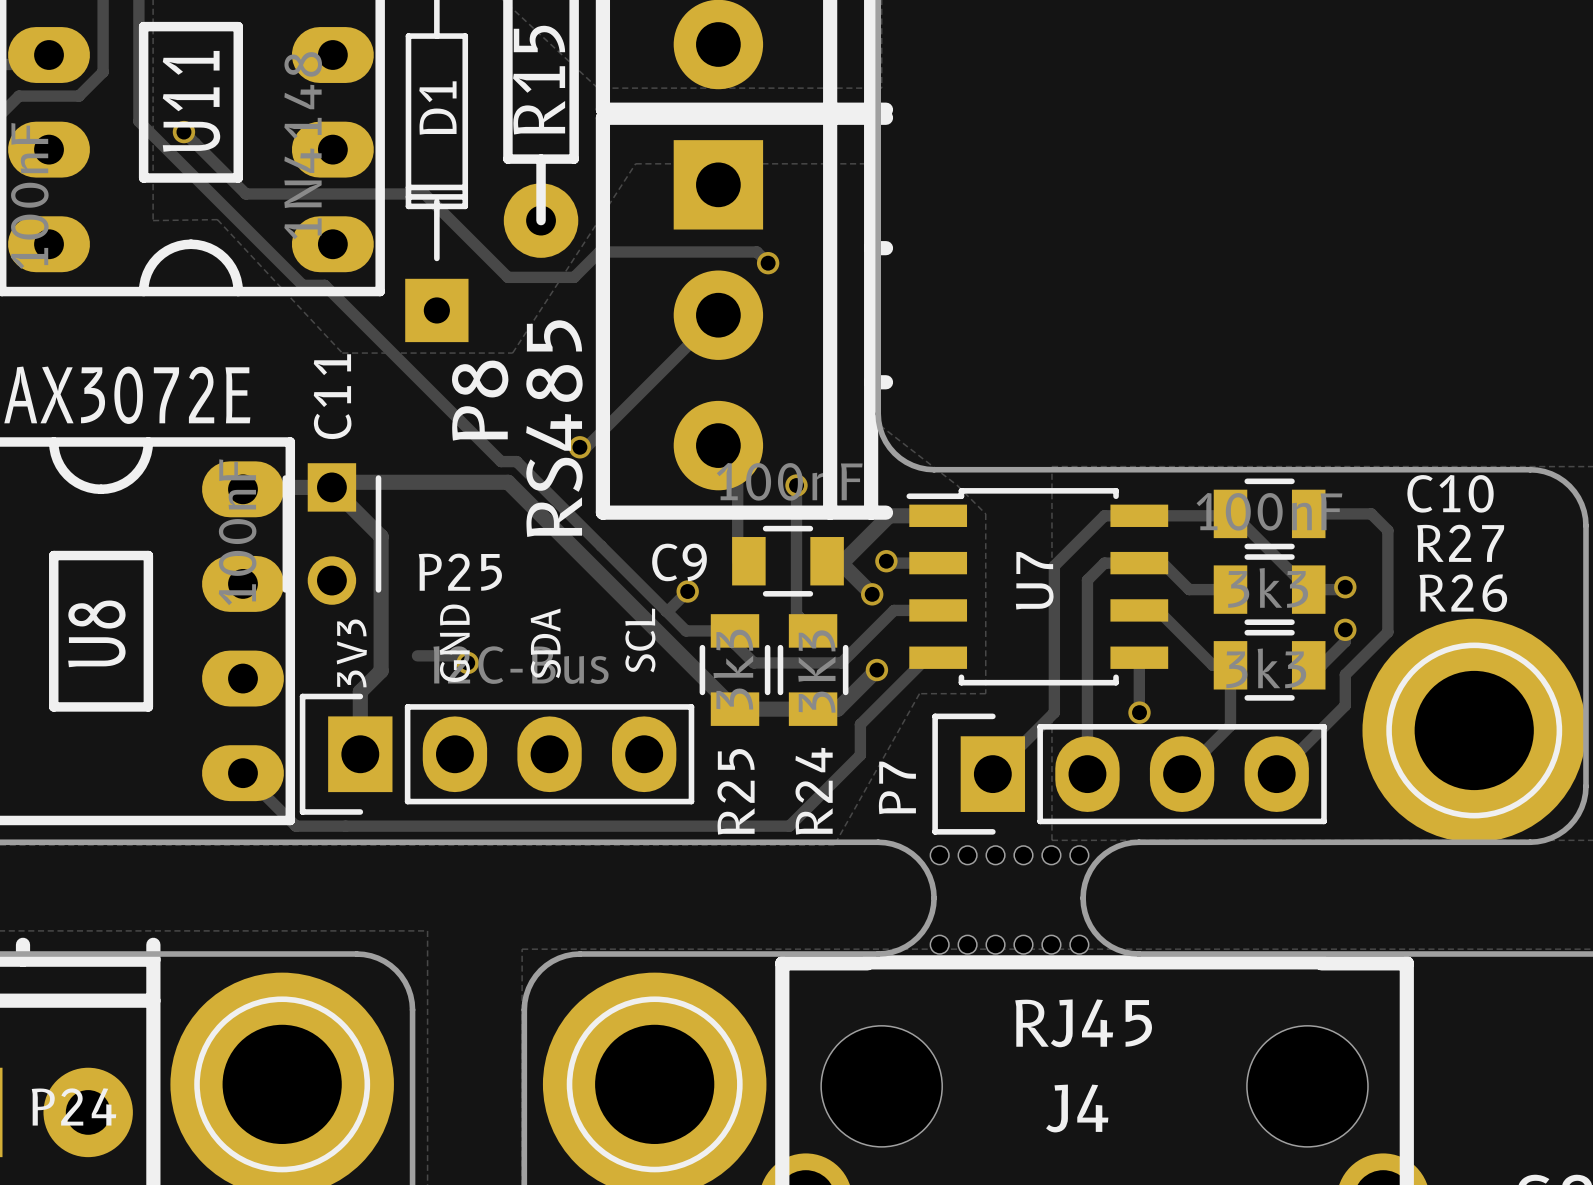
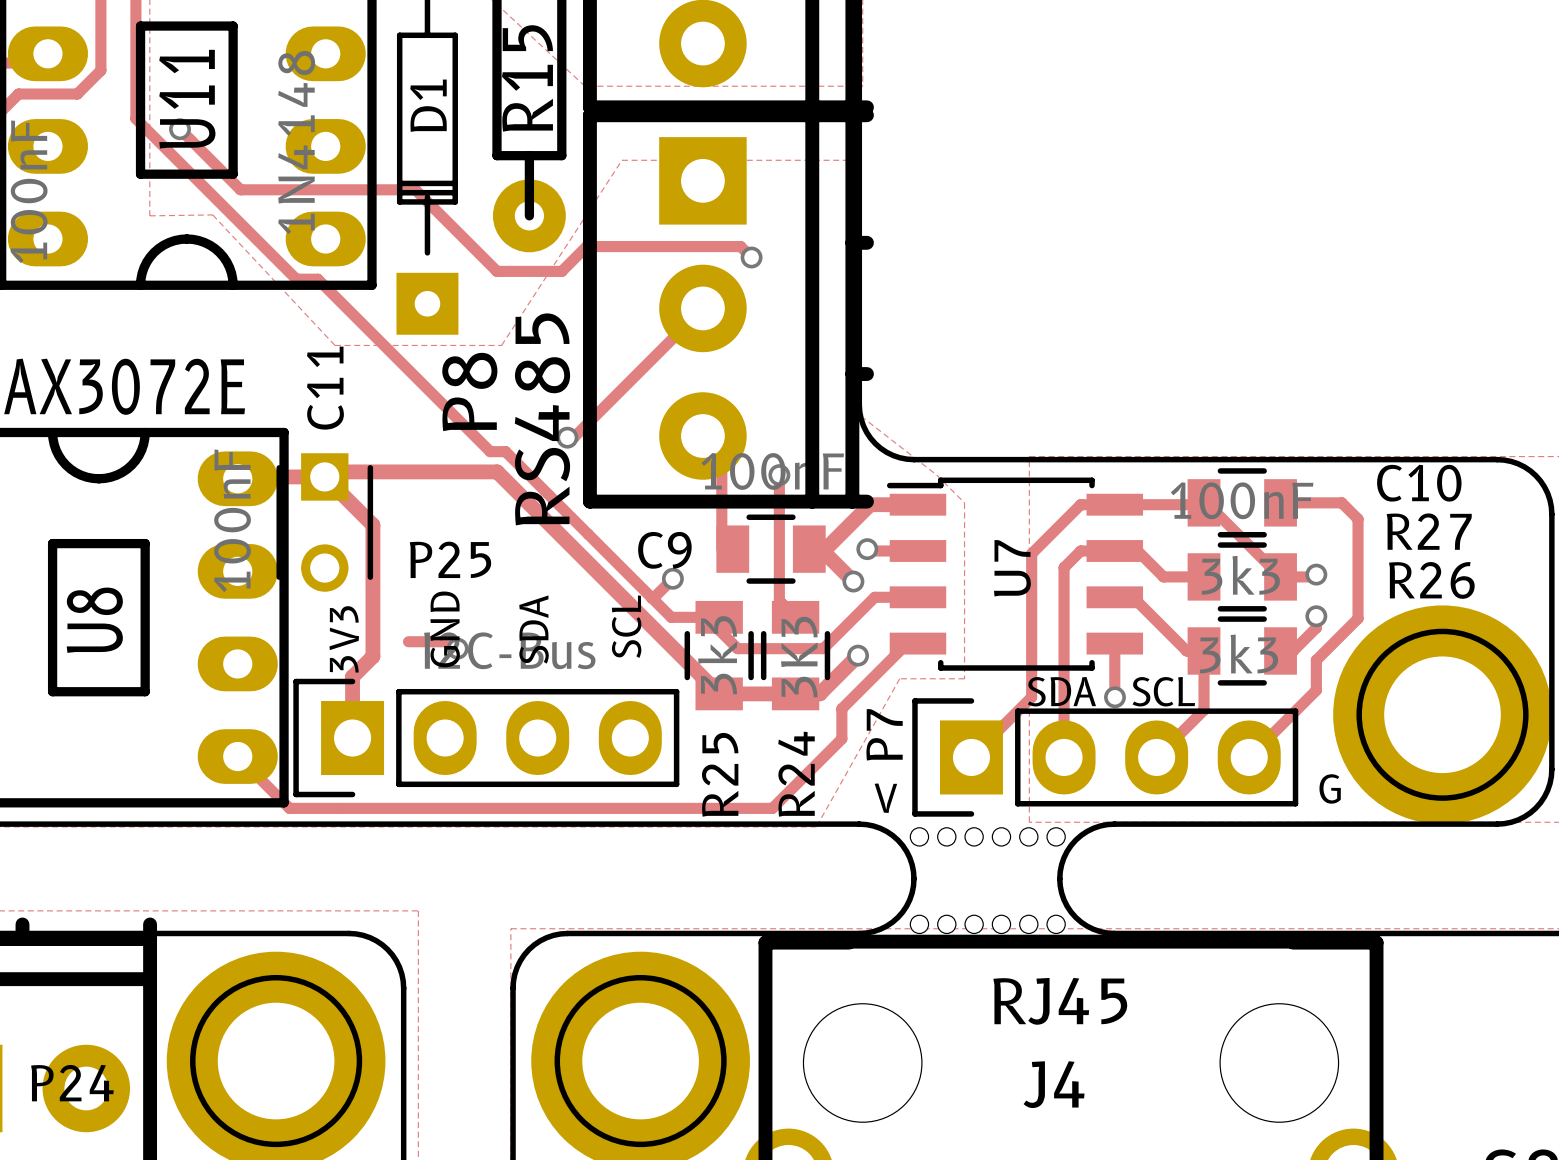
text: none -> SDA (1061, 691)
text: none -> SCL (1163, 691)
P7 name position: P7 (897, 787) -> P7 (884, 734)
text: none -> G (1330, 788)
text: none -> V (885, 798)

